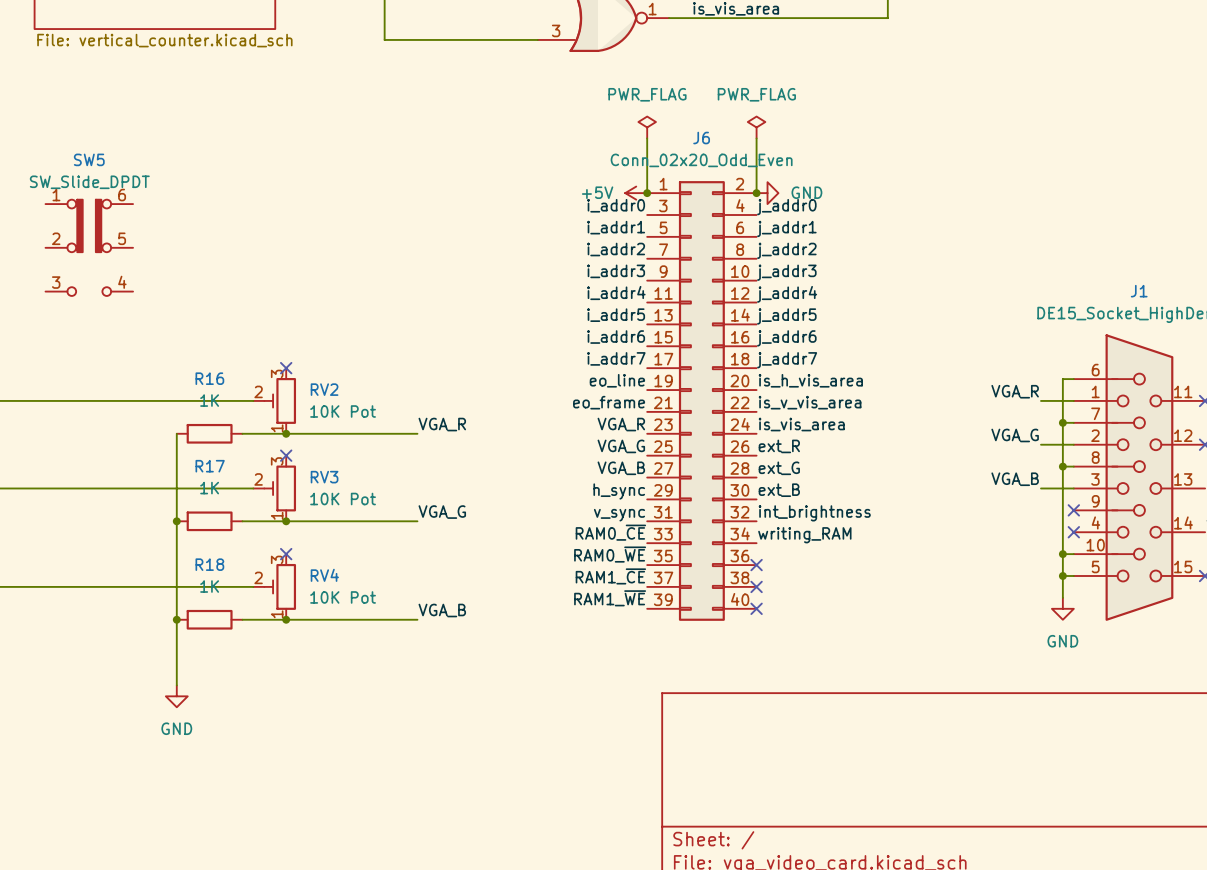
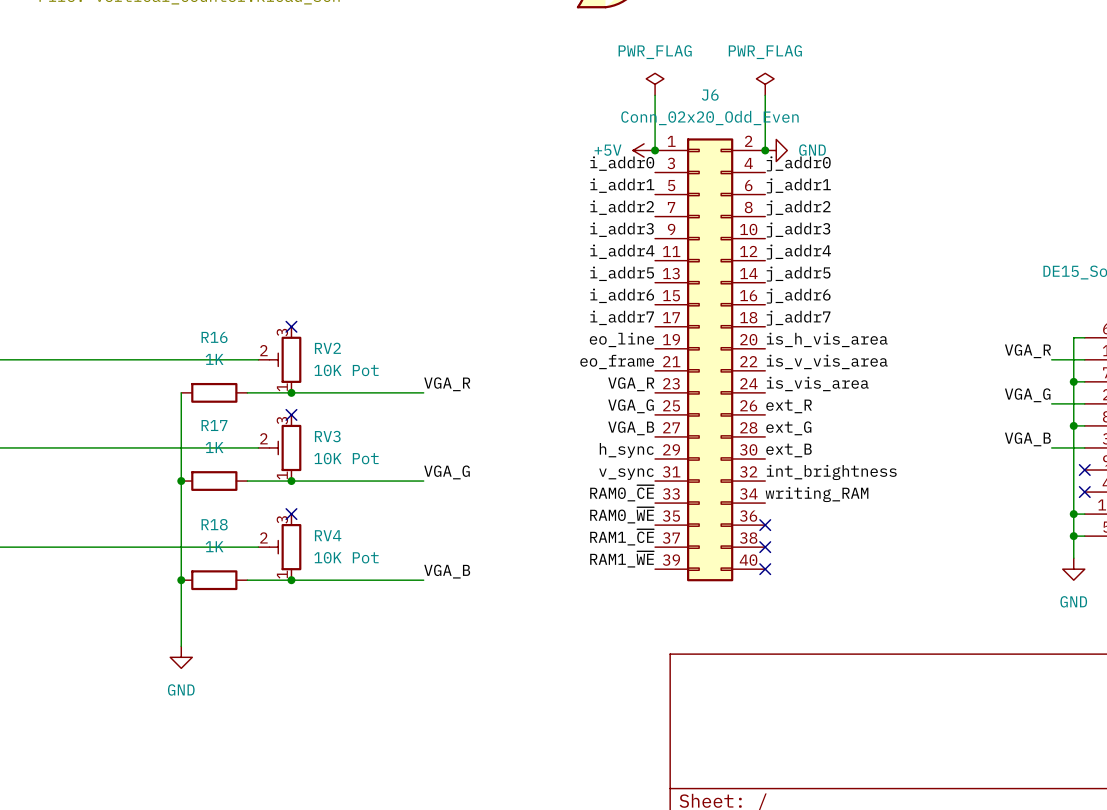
SW5: SW_Slide_DPDT (89, 247) -> none

